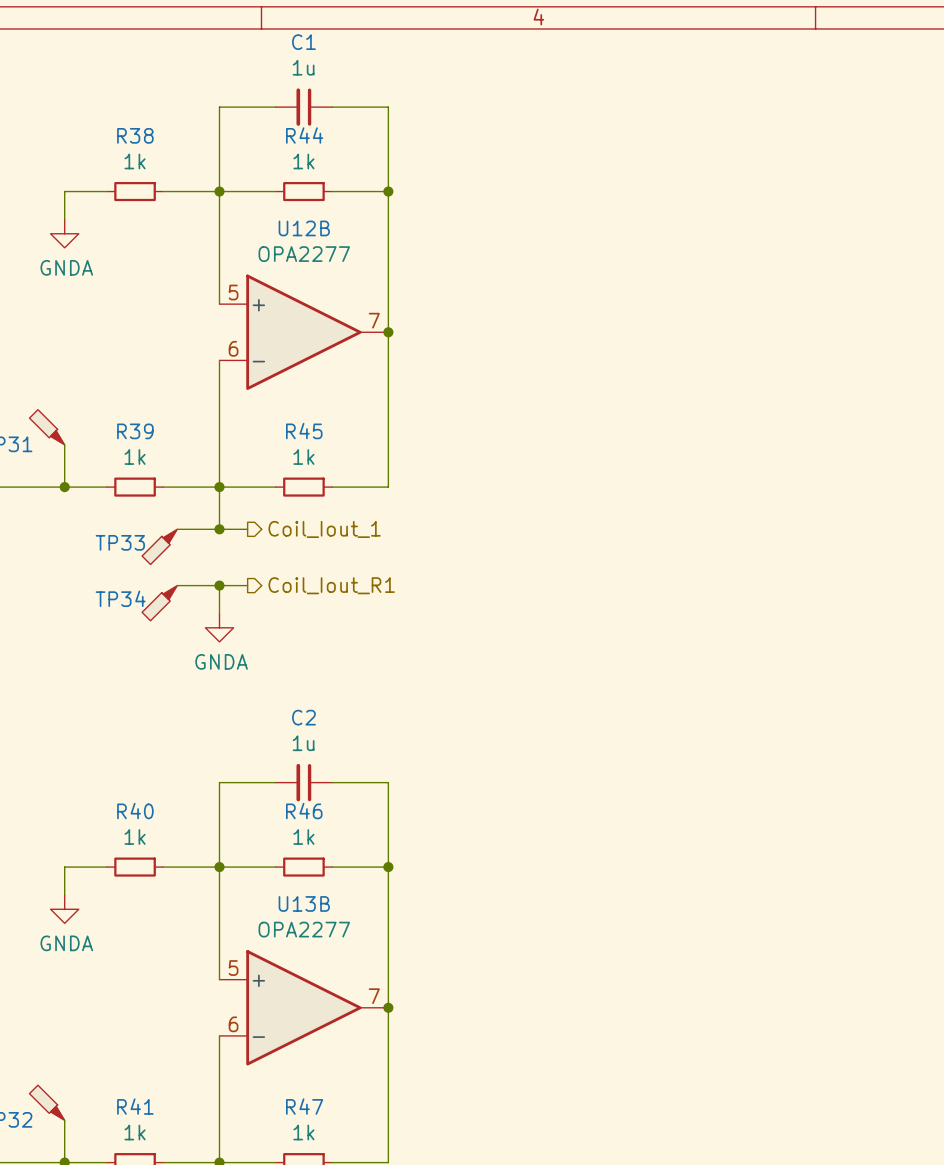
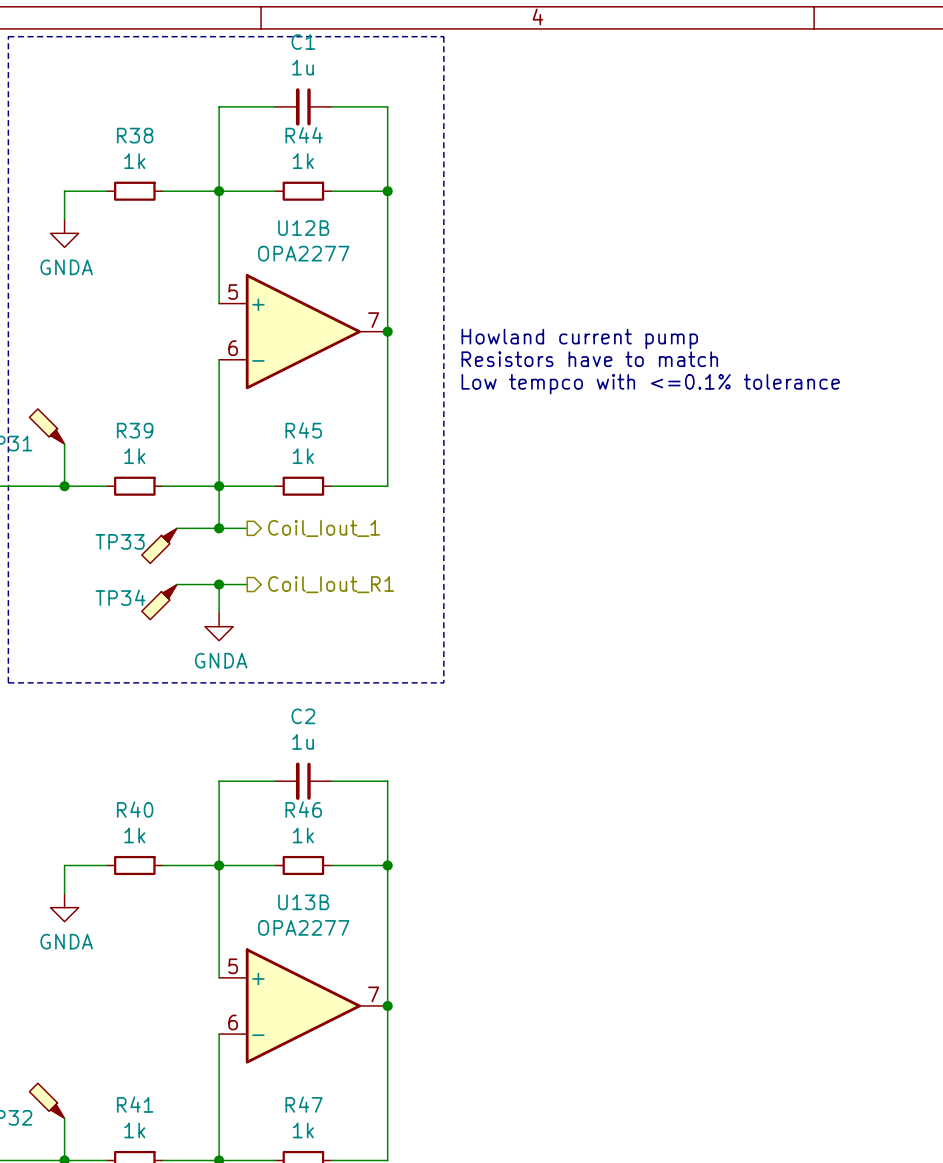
line: none -> (8, 36) (8, 682) (443, 682) (443, 36) (8, 36)
text: none -> Howland current pump (579, 338)
text: none -> Resistors have to match (589, 359)
text: none -> Low tempco with <=0.1% tolerance (650, 384)

